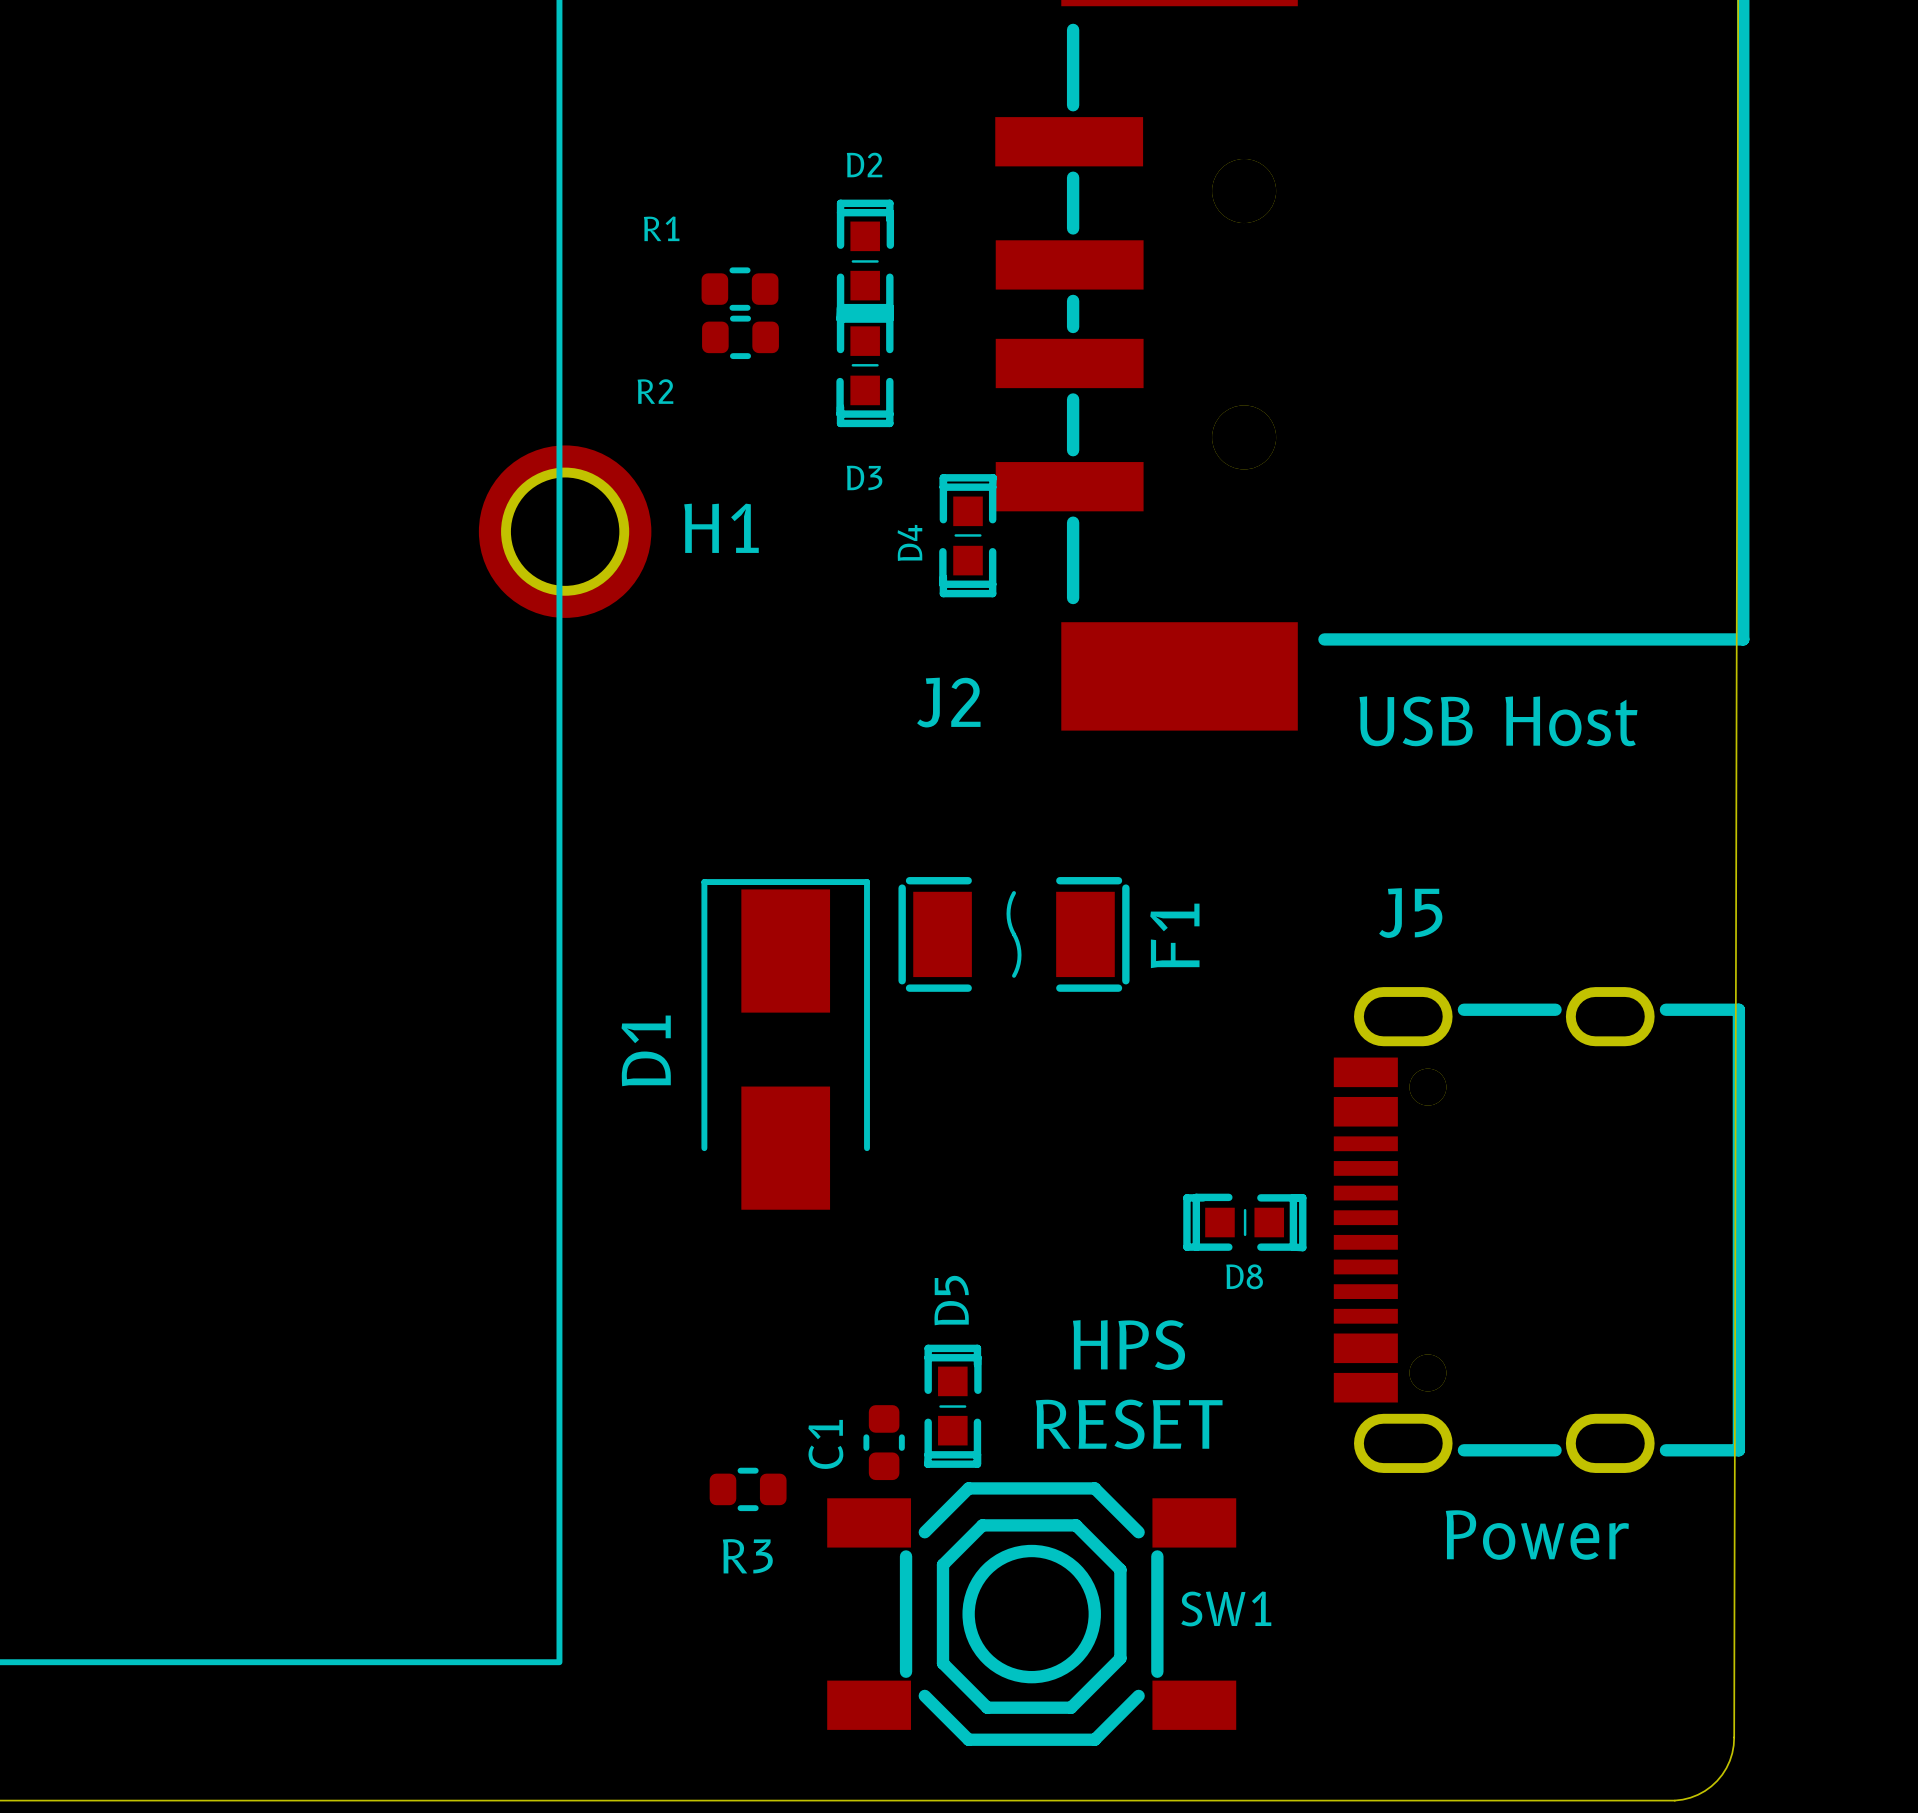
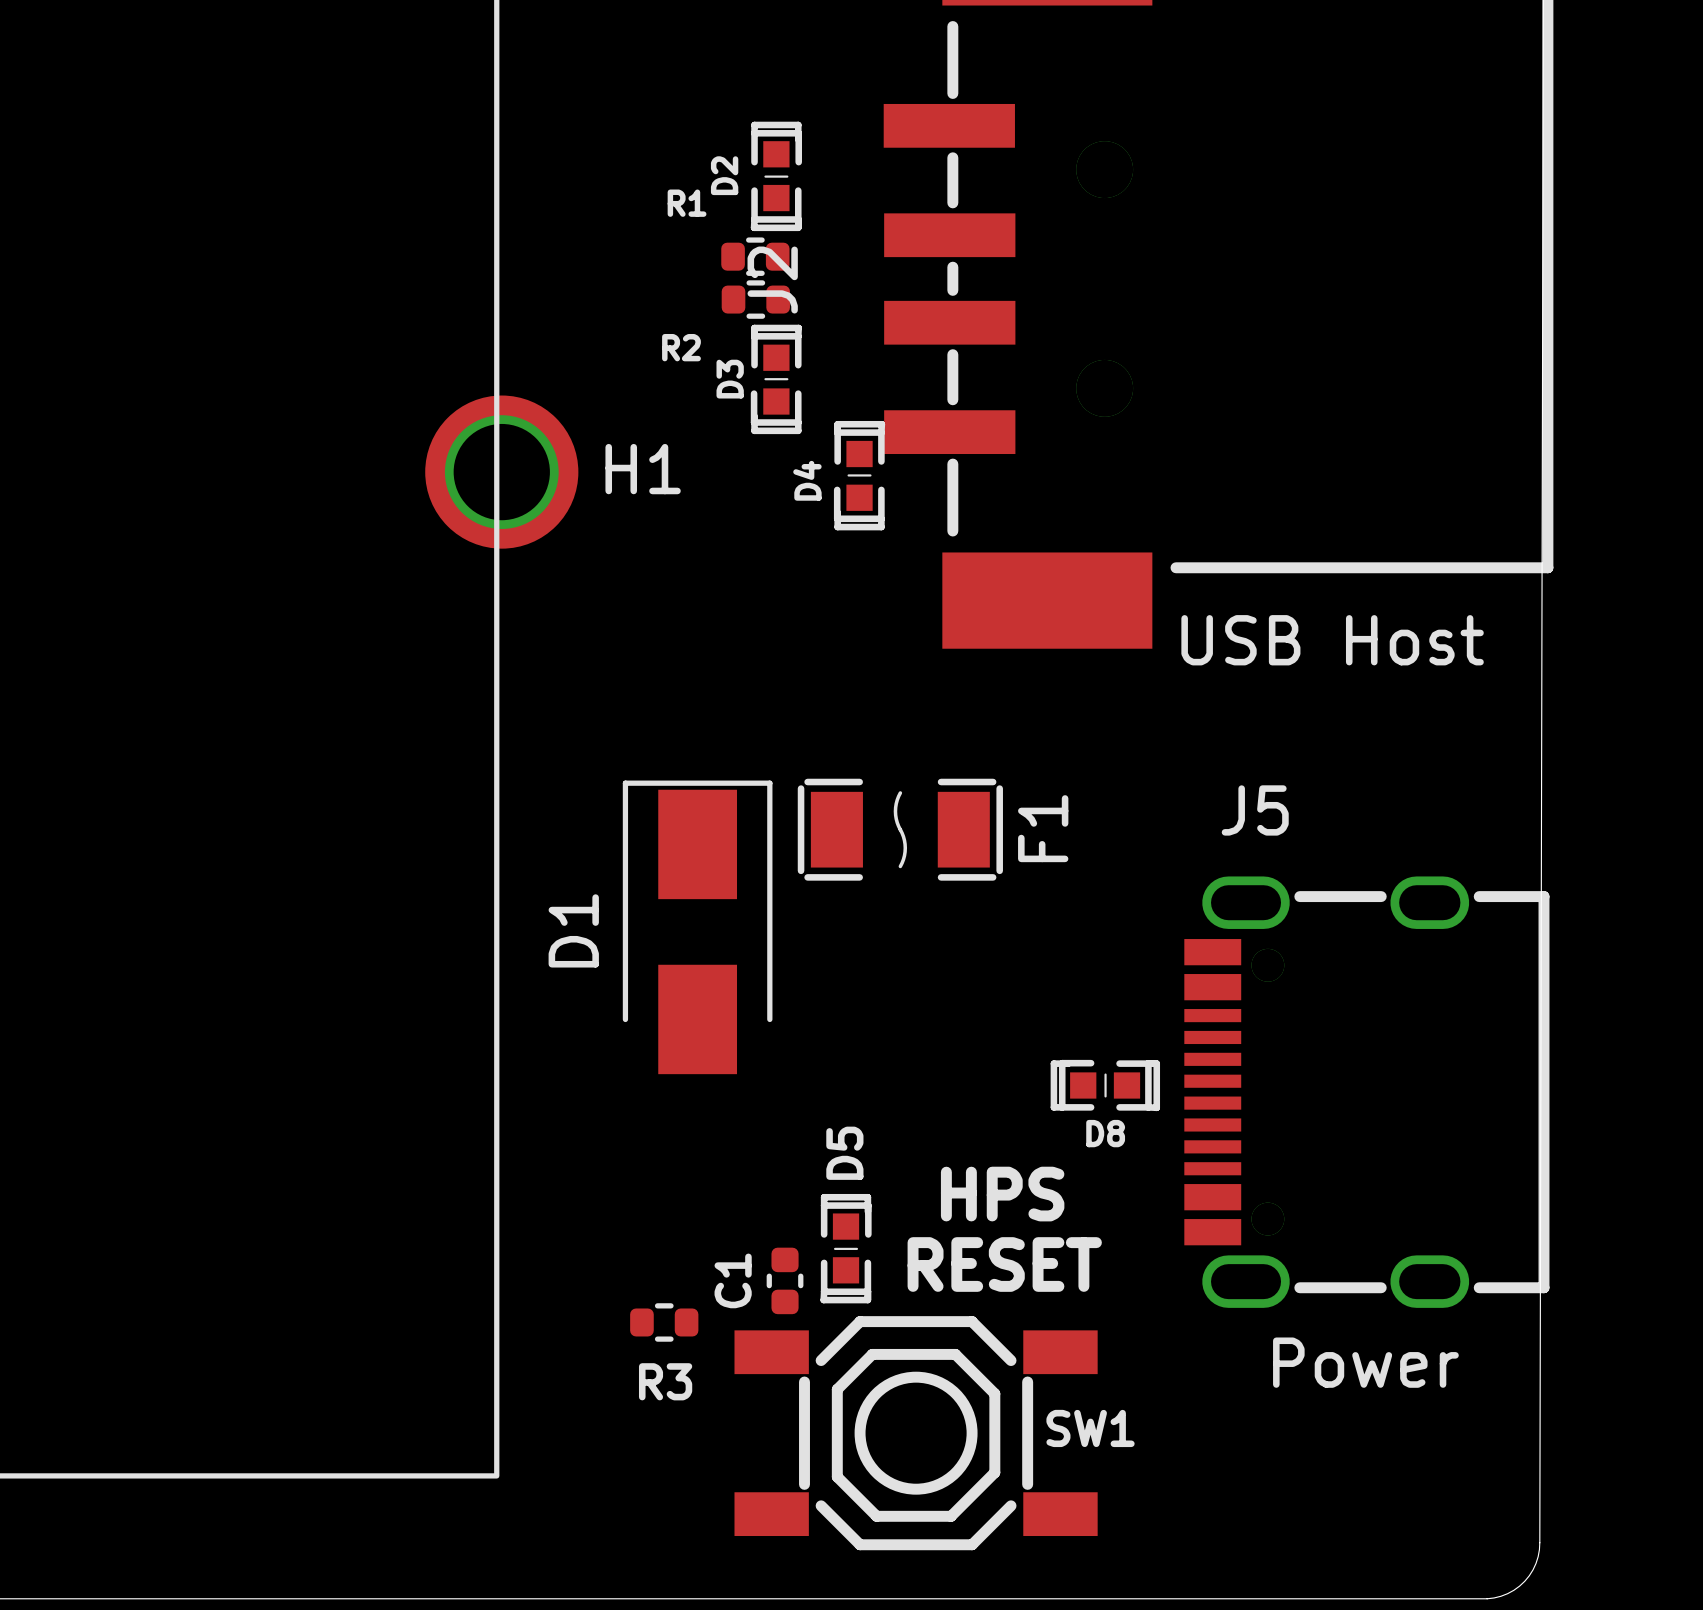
D2 name rotation: 0° (864, 165) -> 90° counterclockwise (724, 175)
D2 position: (865, 261) -> (776, 176)
R1 position: (740, 289) -> (755, 256)
R2 position: (740, 337) -> (755, 299)
D3 position: (865, 365) -> (776, 379)
D3 name rotation: 0° (864, 477) -> 90° counterclockwise (730, 379)
D3 name position: D3 (864, 477) -> D3 (730, 379)
J2 name rotation: 0° (948, 702) -> 90° counterclockwise (772, 280)
J2 name position: J2 (948, 702) -> J2 (772, 280)

